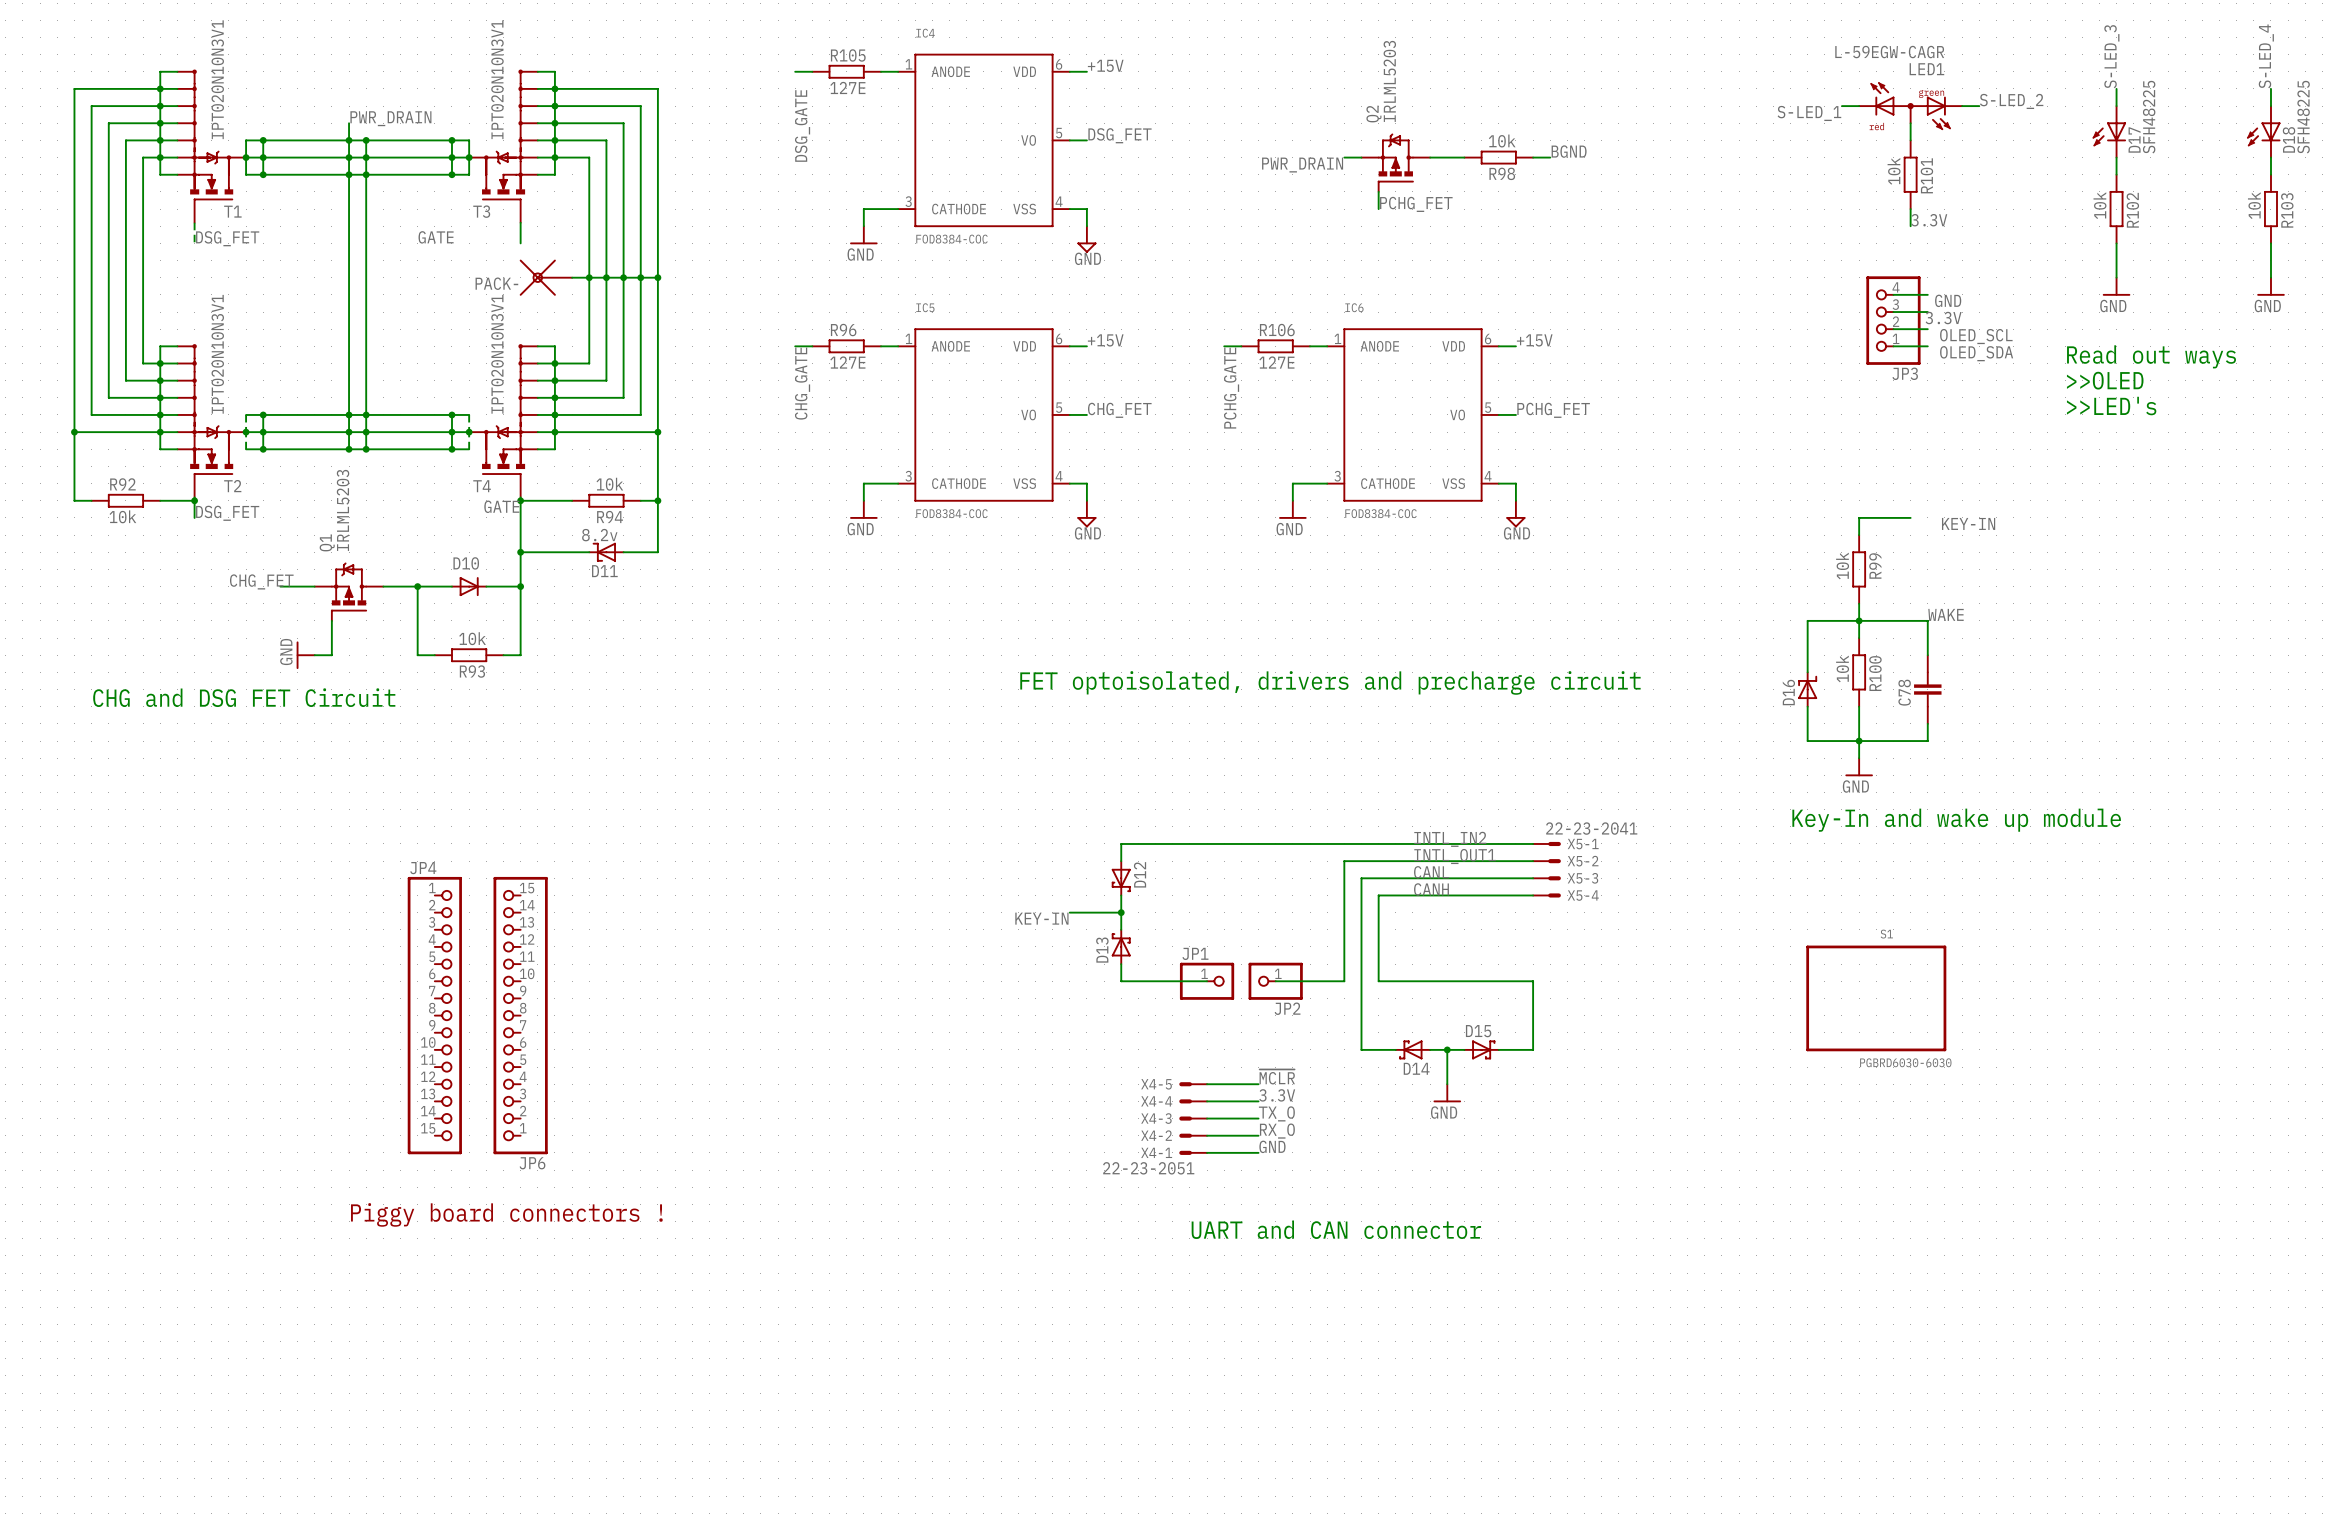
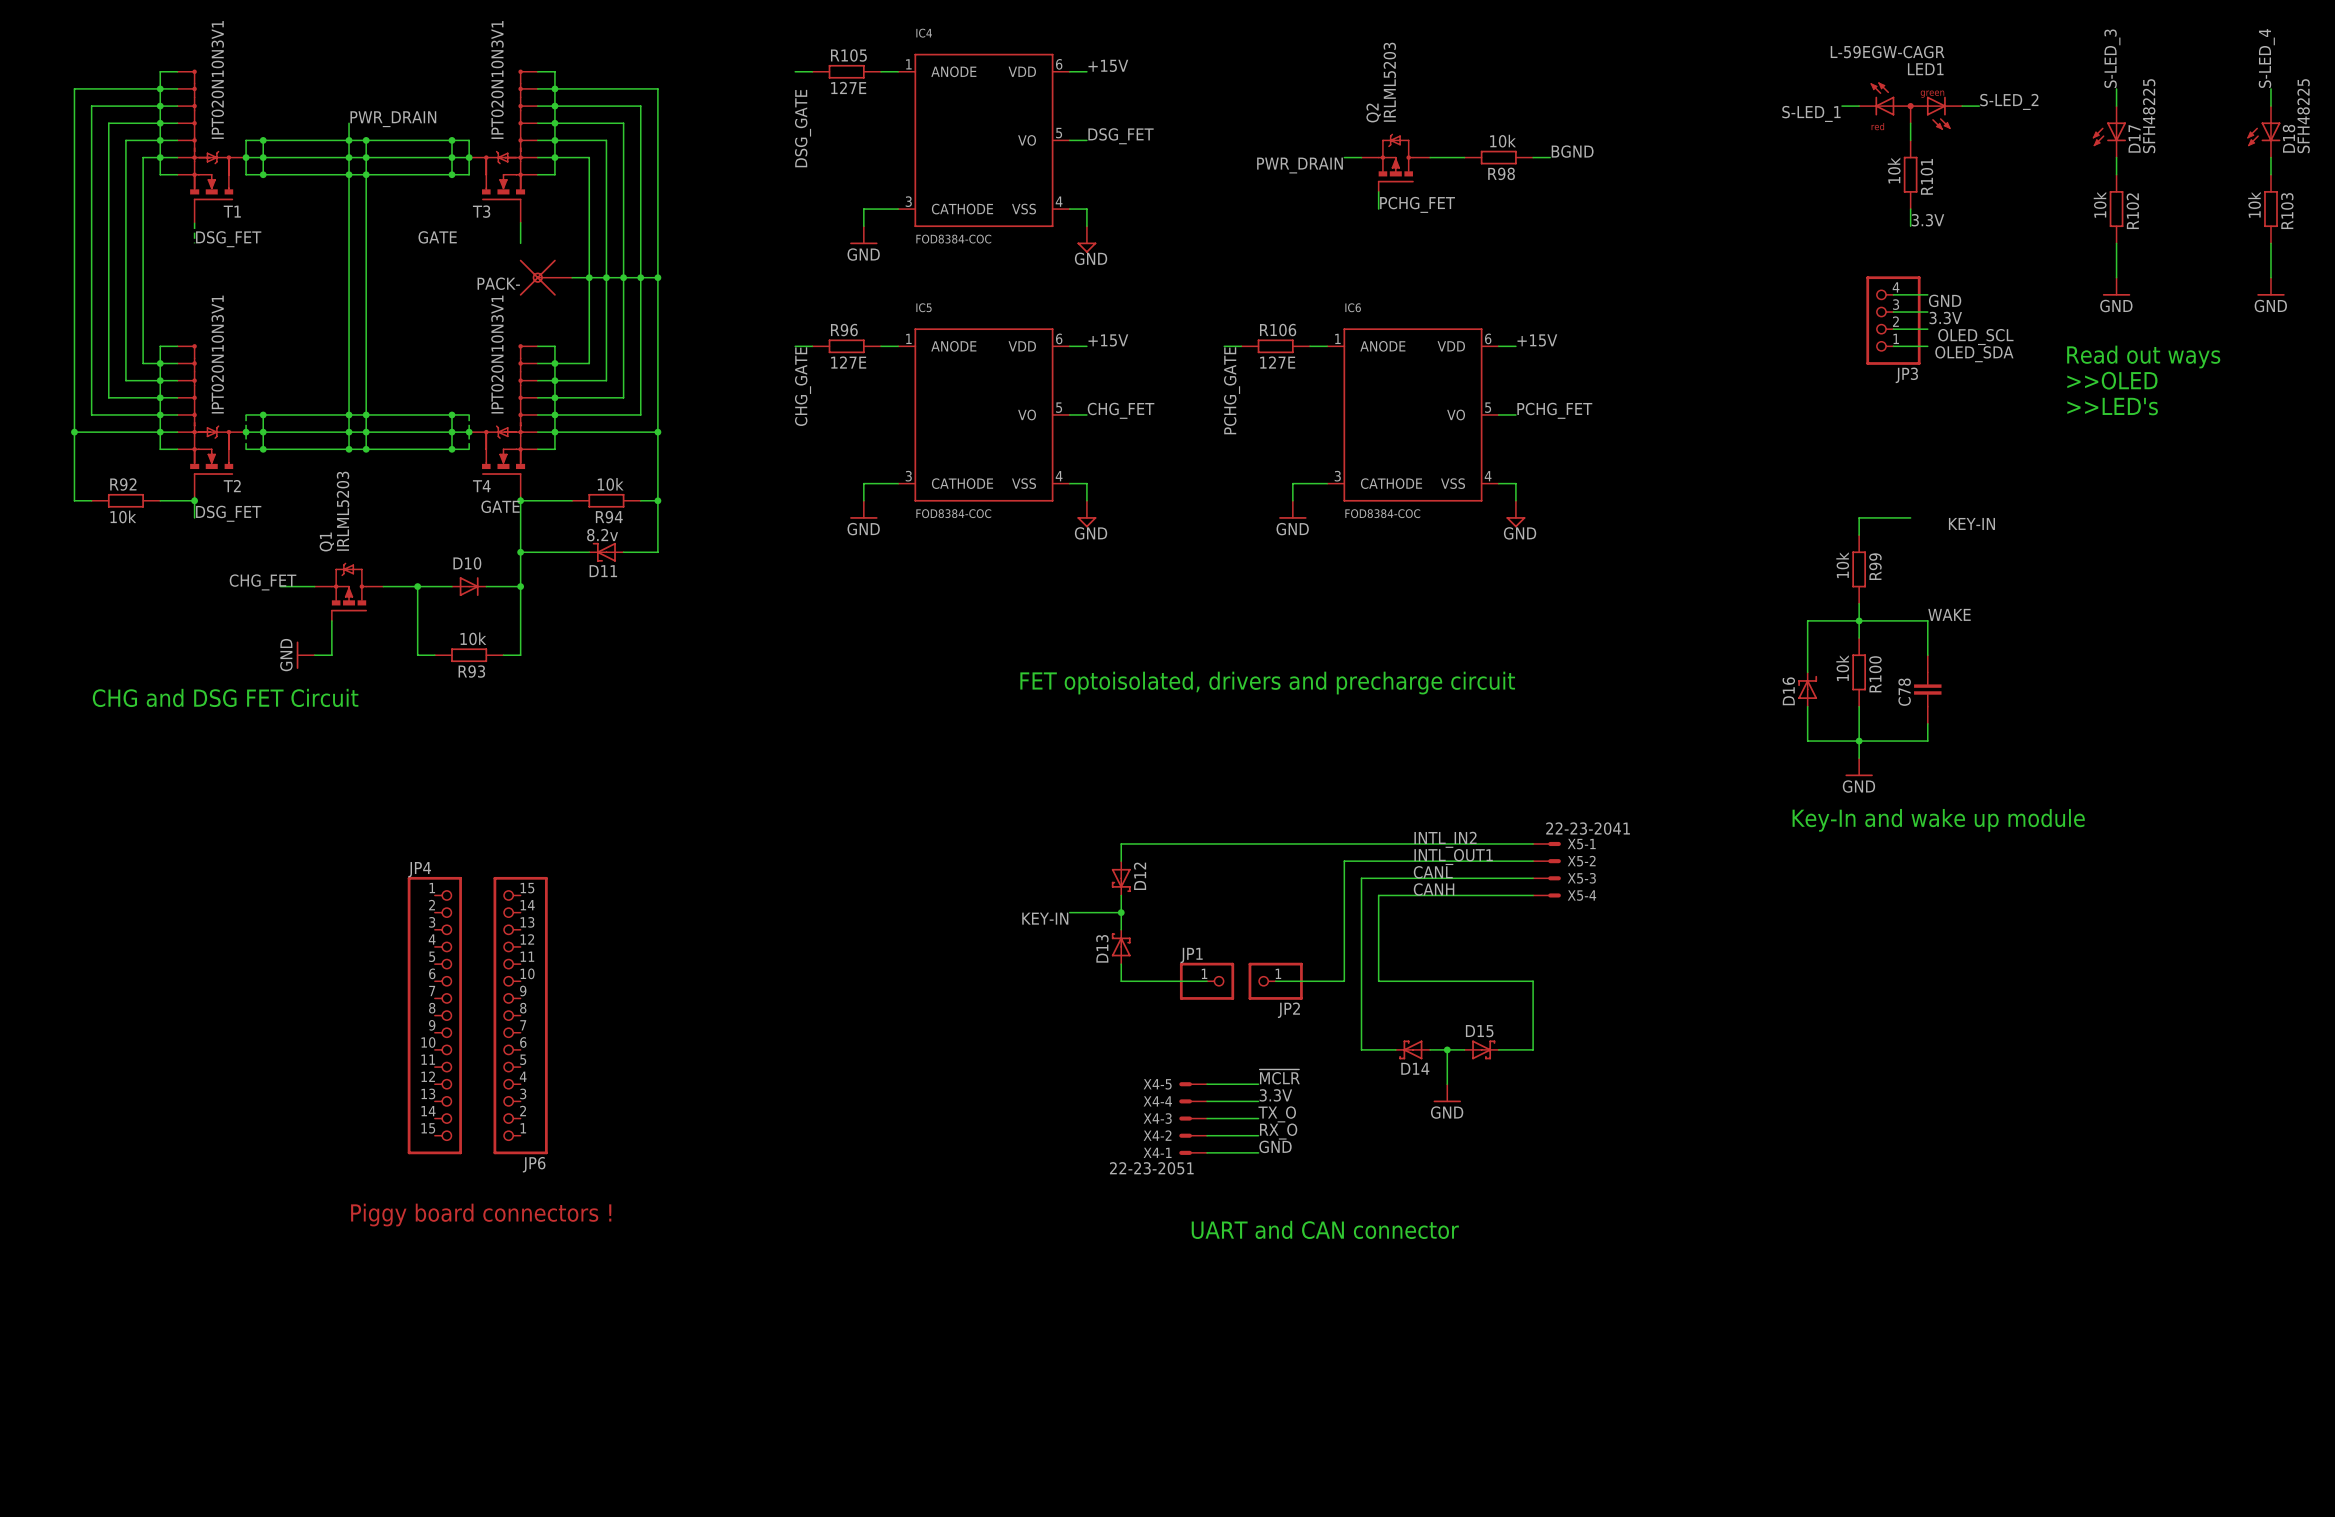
S1: PGBRD6030-6030 (1876, 998) -> none

